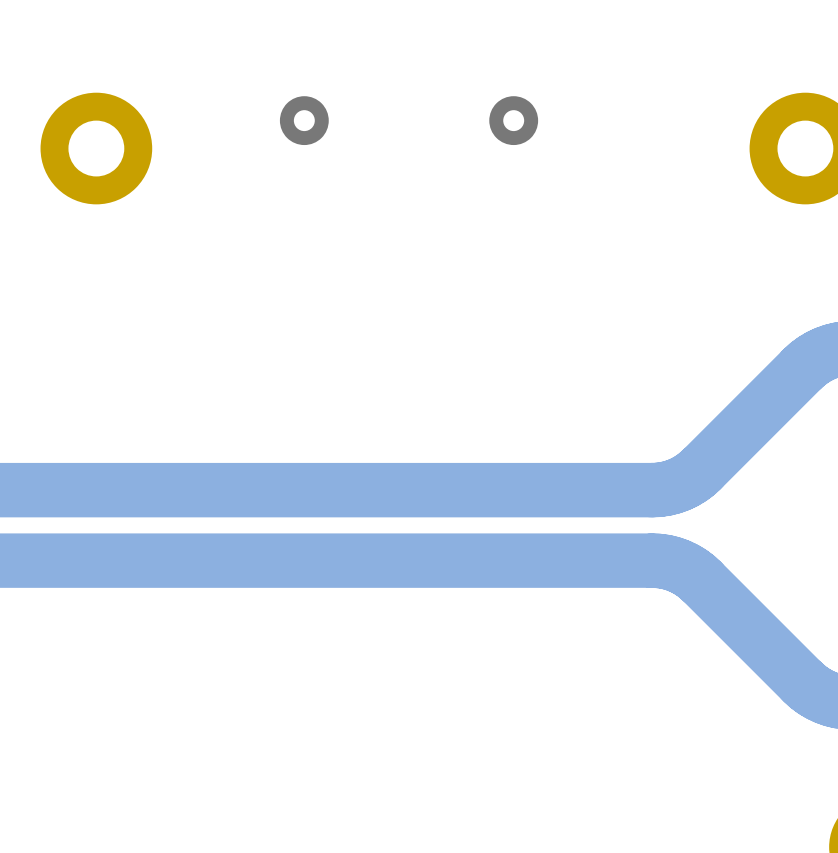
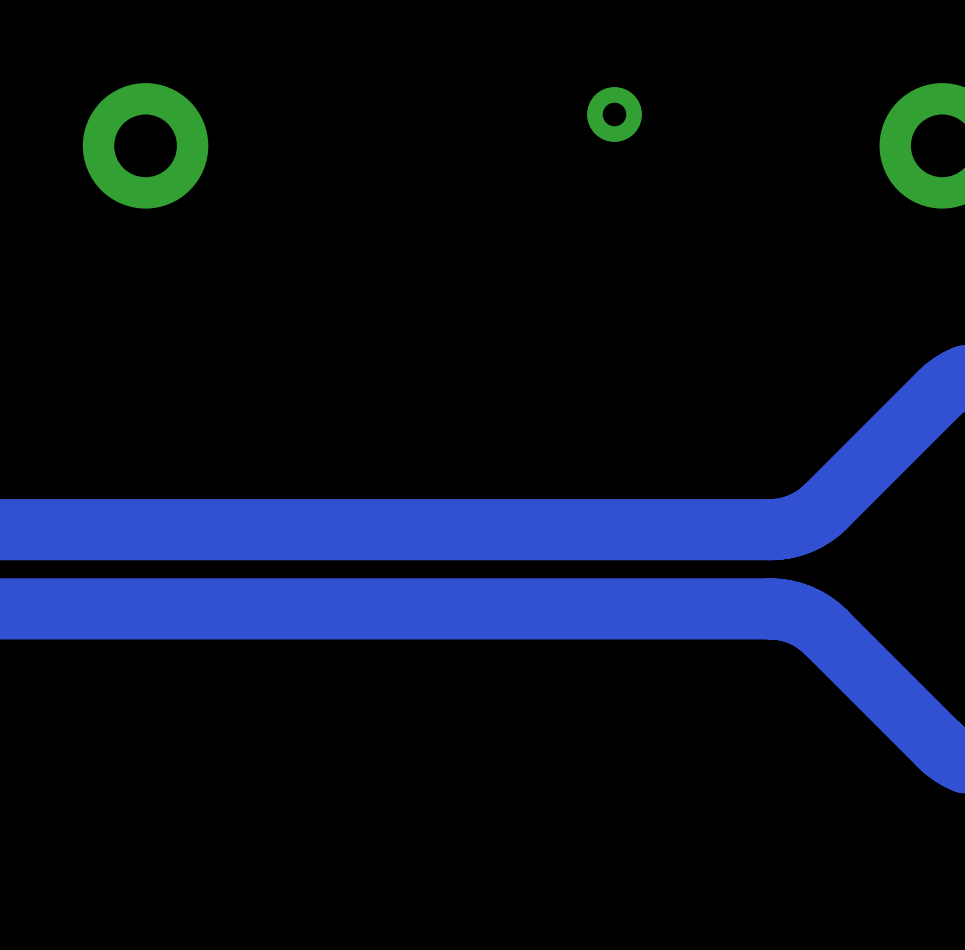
via: (304, 120) -> none

